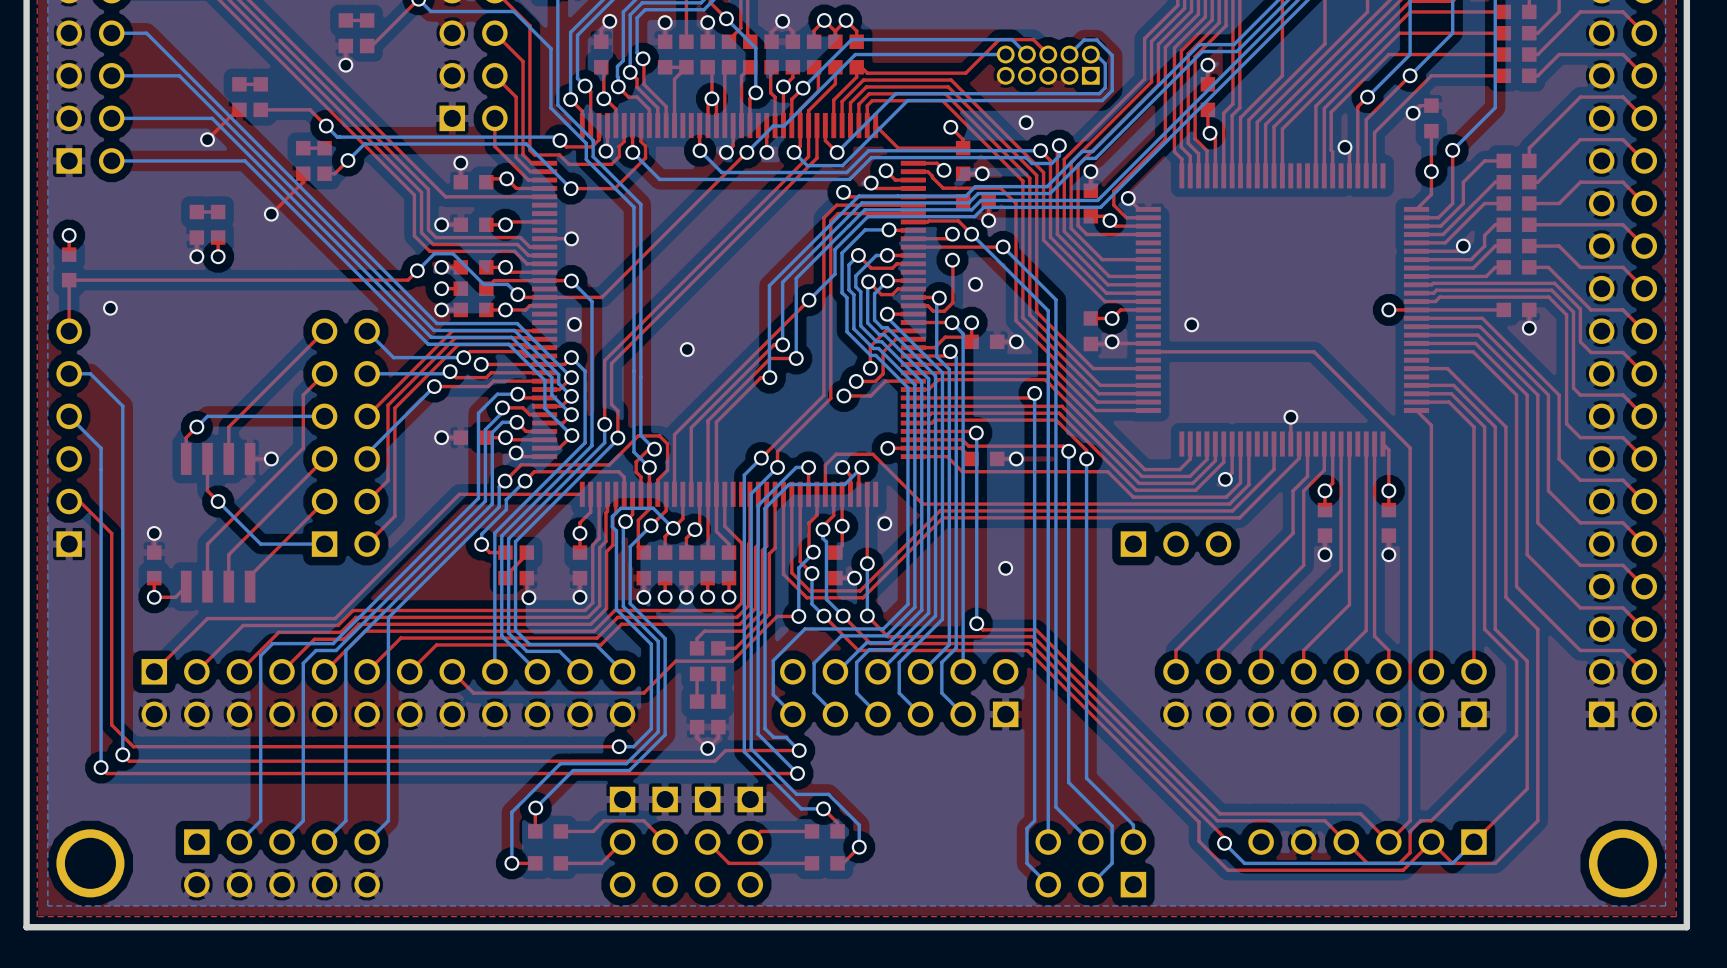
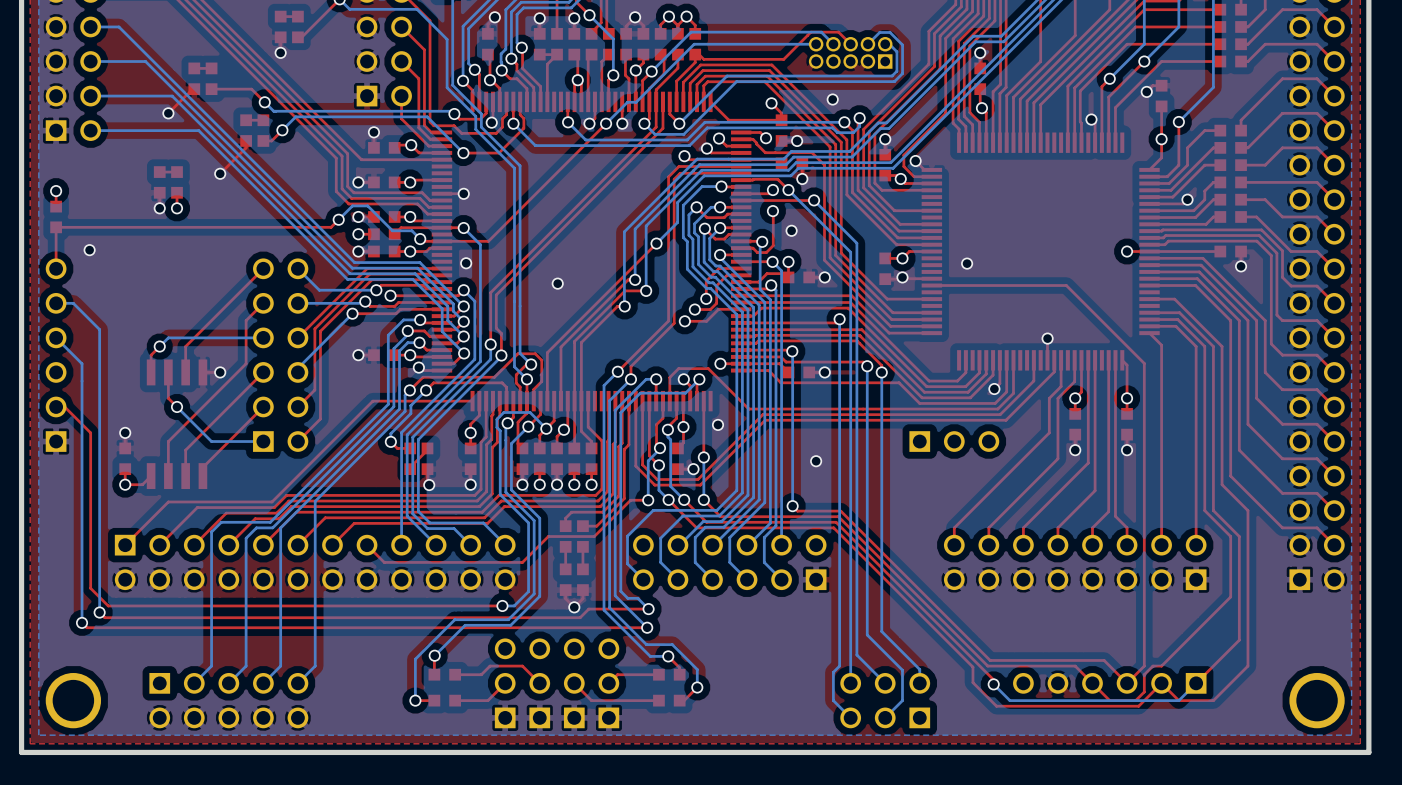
part rotation: 0° (622, 842) -> 180° (505, 683)
part rotation: 0° (665, 842) -> 180° (539, 683)
part rotation: 0° (707, 842) -> 180° (574, 683)
part rotation: 0° (750, 842) -> 180° (608, 683)

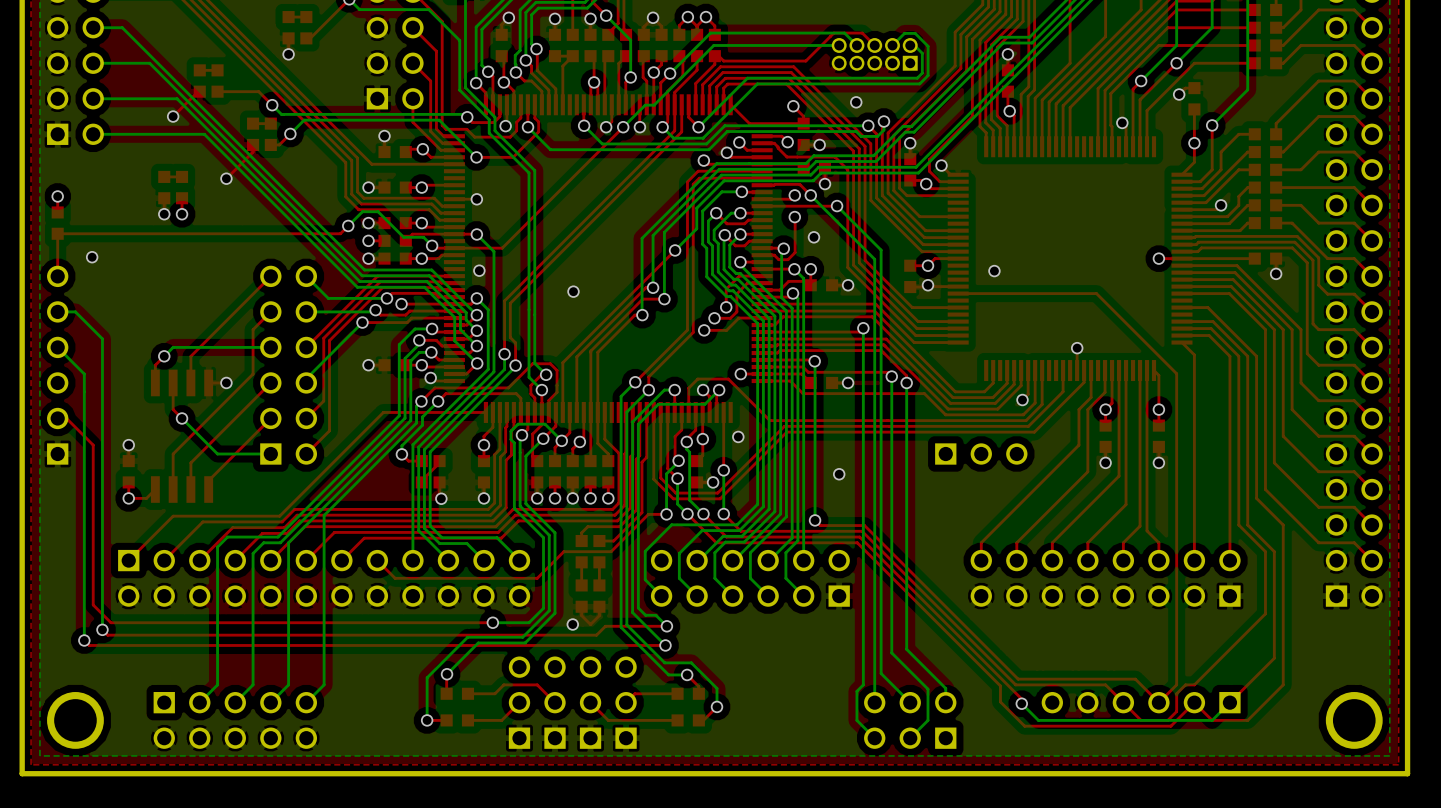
top track: (107, 605) (502, 605) -> (110, 622) (492, 622)
via position: (502, 605) -> (492, 622)
bottom track: (514, 605) (502, 605) -> (529, 622) (492, 622)
via position: (574, 607) -> (572, 624)

